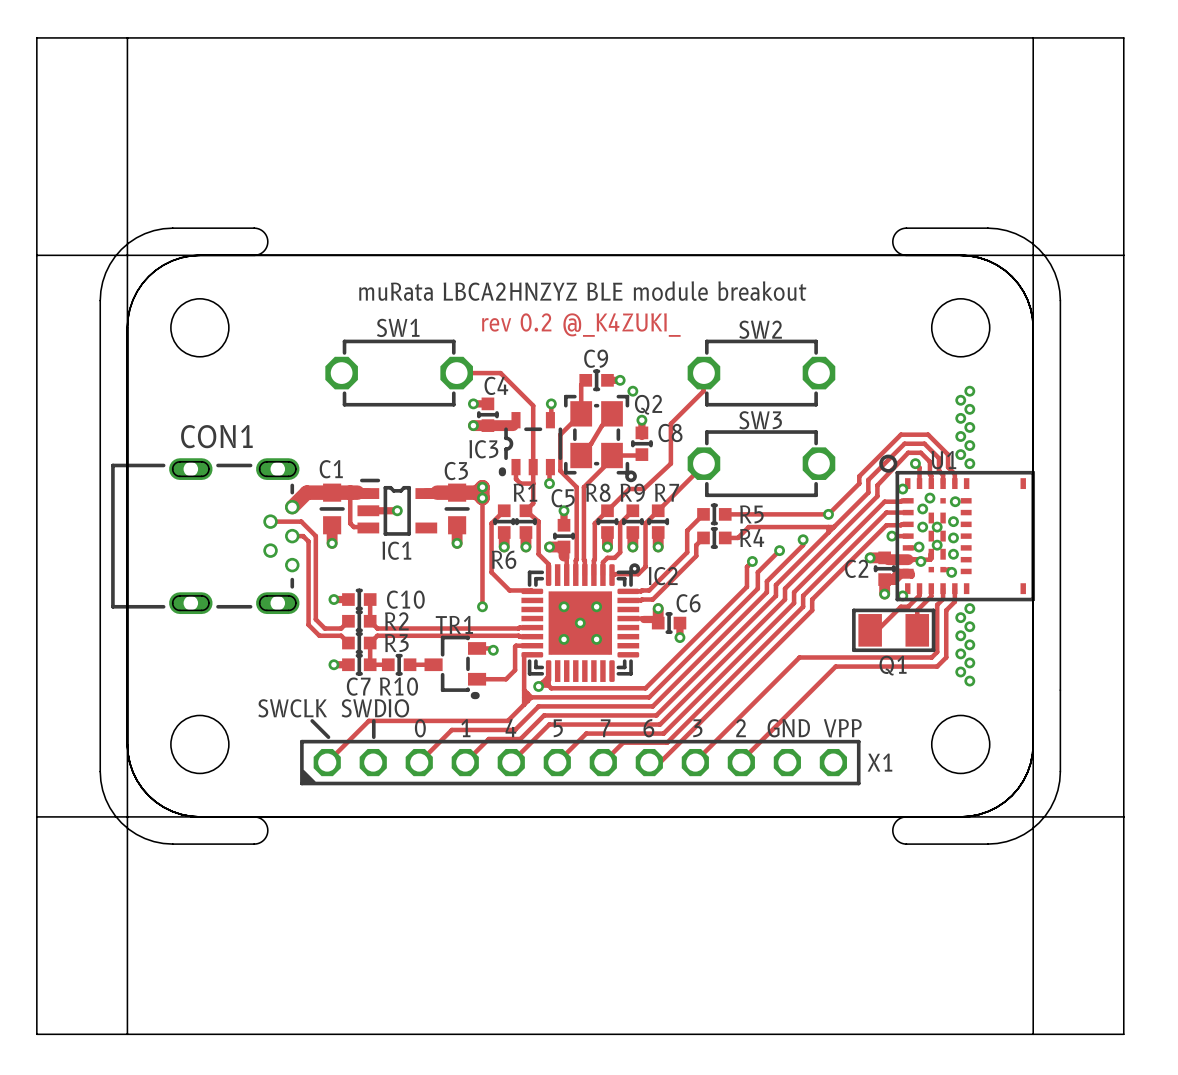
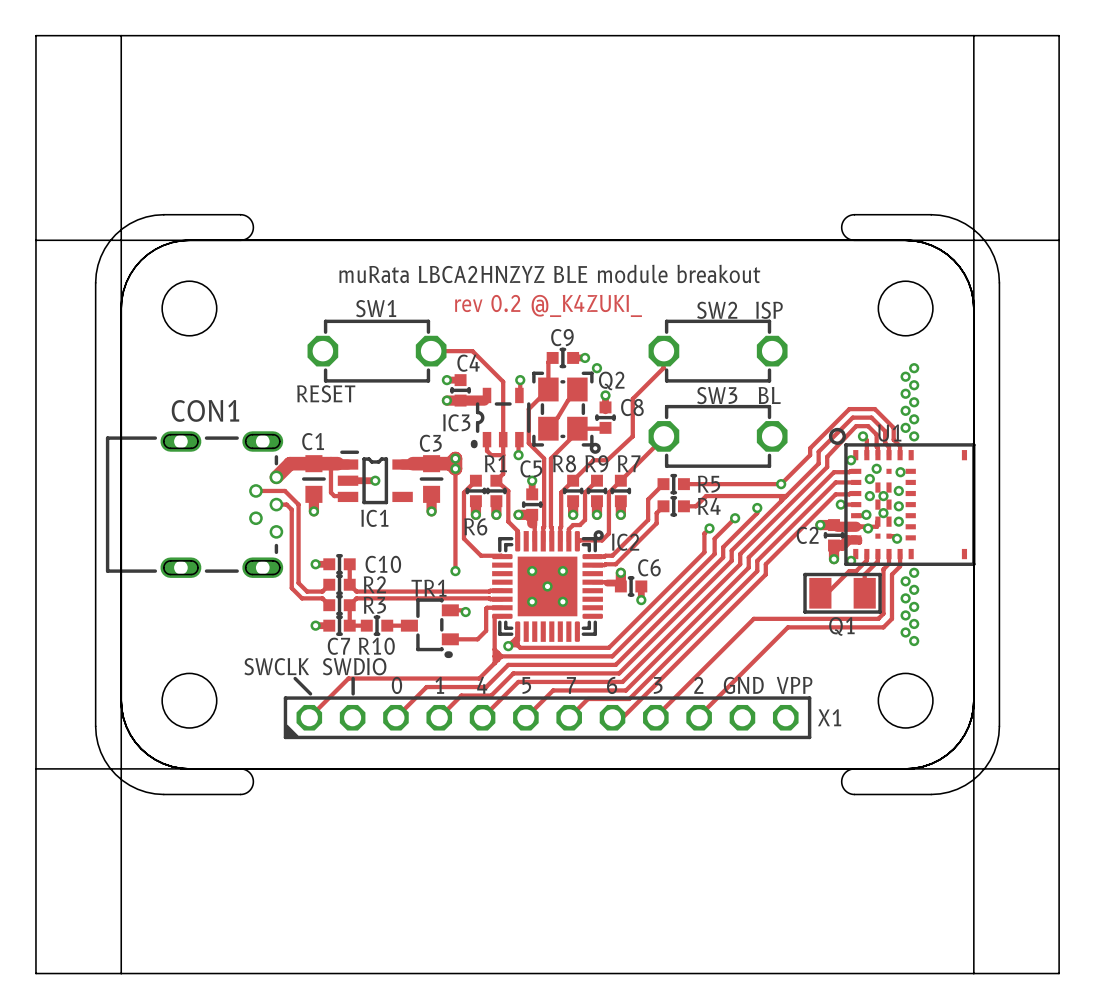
text: none -> ISP (769, 310)
text: none -> RESET (326, 393)
text: none -> BL (769, 395)

